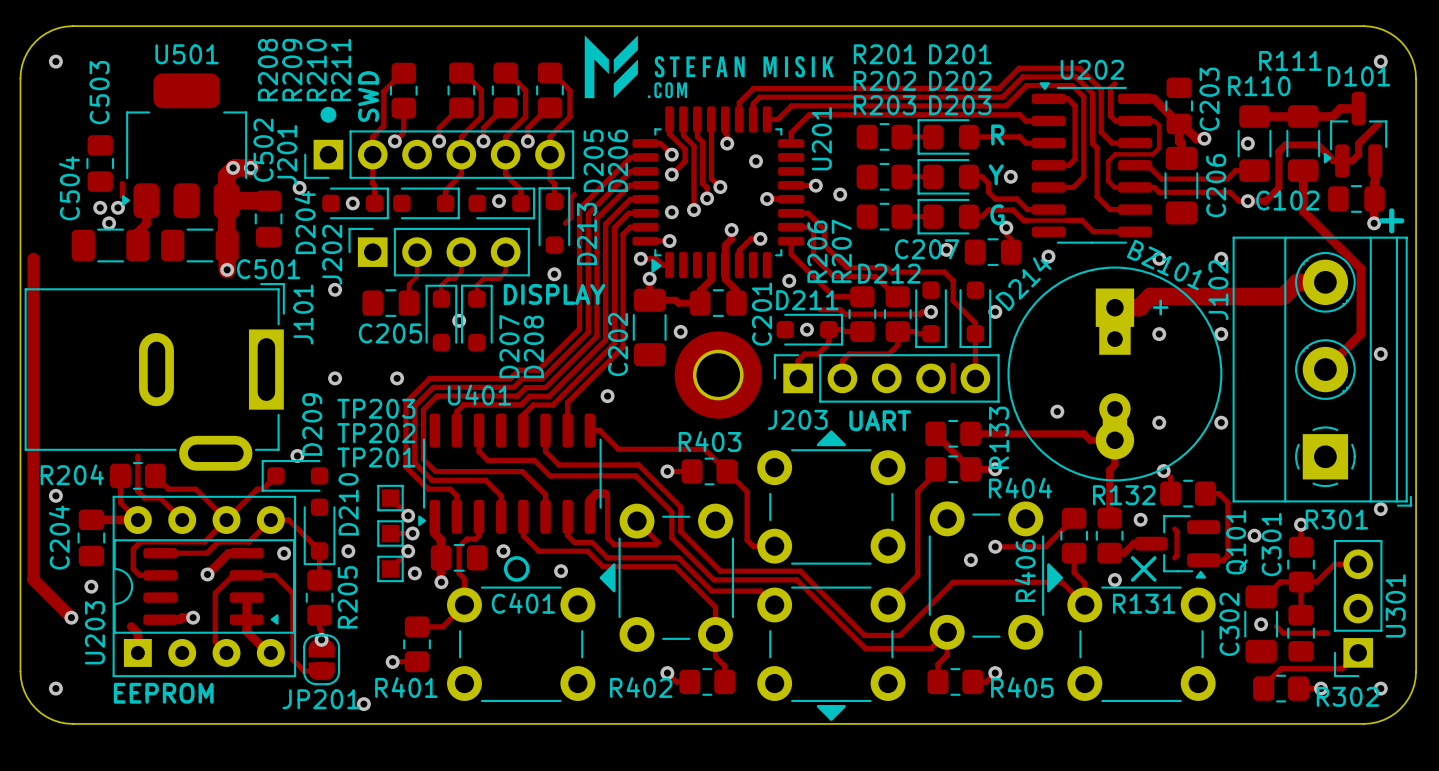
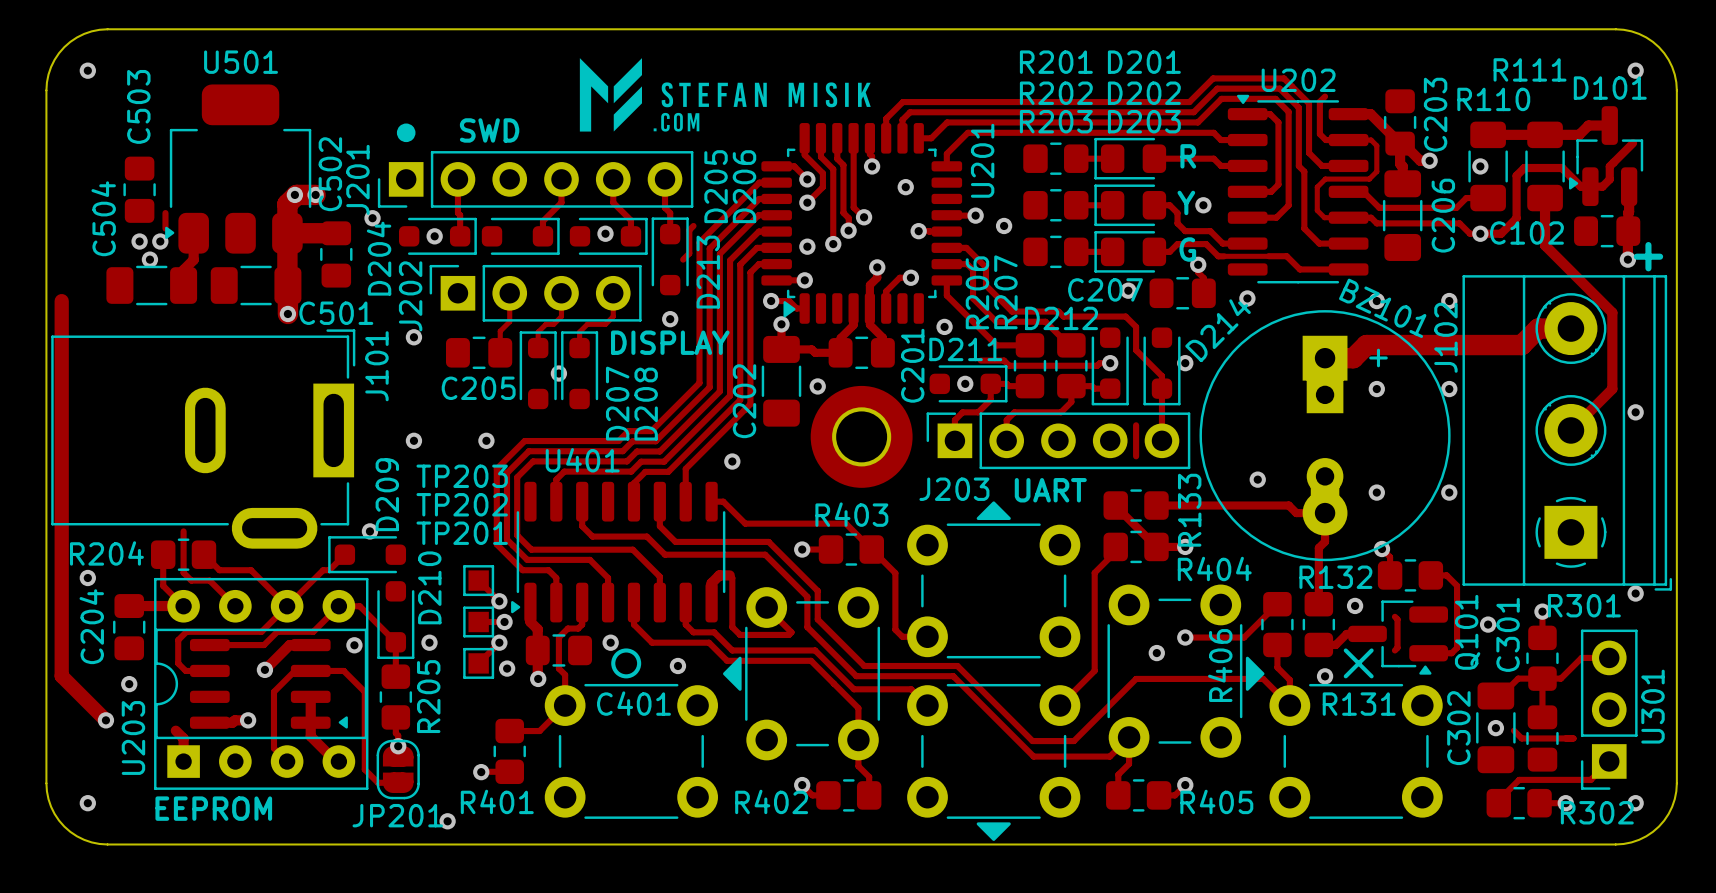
drawing: [613, 35, 638, 99] -> none
drawing: none -> [613, 58, 674, 132]
drawing: [784, 56, 815, 78] -> none
drawing position: (596, 66) -> (593, 94)
drawing position: (659, 66) -> (831, 94)
drawing position: (674, 66) -> (684, 94)
drawing position: (690, 66) -> (703, 94)
drawing position: (707, 66) -> (722, 94)
drawing position: (721, 66) -> (740, 94)
drawing position: (739, 66) -> (760, 94)
drawing position: (770, 66) -> (796, 94)
drawing position: (828, 66) -> (864, 94)
drawing: none -> [813, 82, 818, 107]
drawing: none -> [845, 82, 849, 107]
track: (461, 72) (463, 72) (481, 90) (481, 116) (461, 136) (461, 154) -> none
track: (505, 72) (508, 72) (525, 90) (525, 116) (505, 136) (505, 154) -> none
track: (549, 72) (552, 72) (569, 90) (569, 116) (549, 136) (549, 154) -> none
track: (403, 73) (383, 91) (383, 125) (372, 136) (372, 154) -> none
R208: (403, 90) -> none
R209: (461, 90) -> none
R210: (505, 90) -> none
R211: (549, 90) -> none
drawing position: (657, 90) -> (665, 122)
drawing position: (669, 90) -> (678, 122)
drawing position: (682, 90) -> (693, 122)
text rotation: 0° (368, 96) -> 90° clockwise (489, 130)
drawing position: (649, 96) -> (655, 129)
track: (461, 107) (439, 128) (439, 141) -> none
track: (505, 107) (483, 128) (483, 141) -> none
track: (549, 107) (527, 128) (527, 141) -> none
track: (403, 108) (403, 132) (394, 141) -> none
via: (394, 141) -> none
via: (439, 141) -> none
via: (483, 141) -> none
via: (527, 141) -> none

